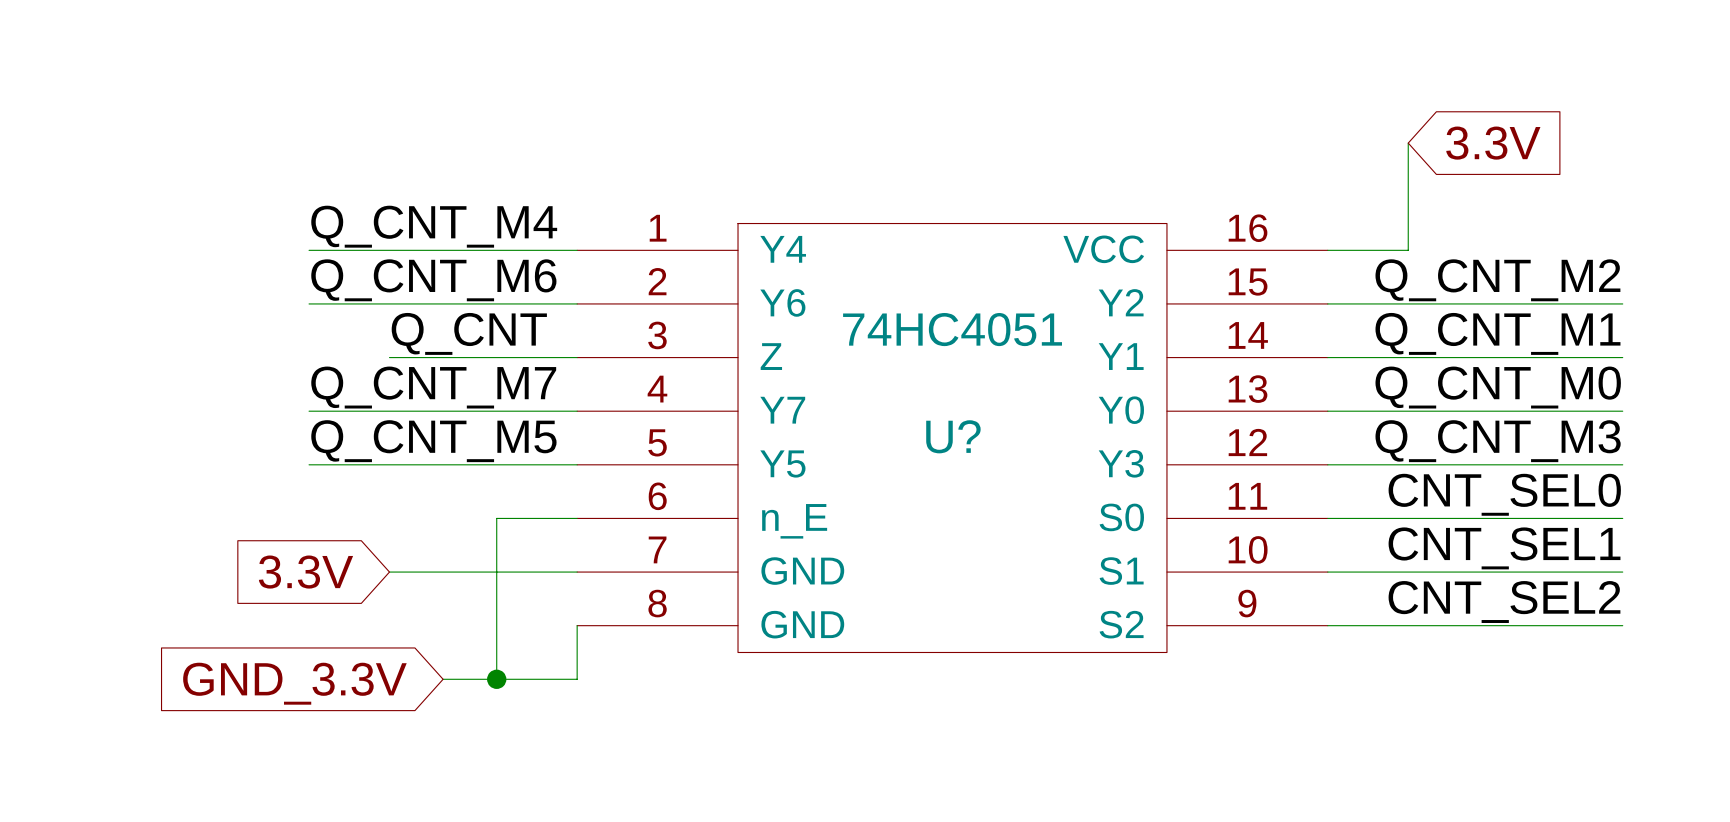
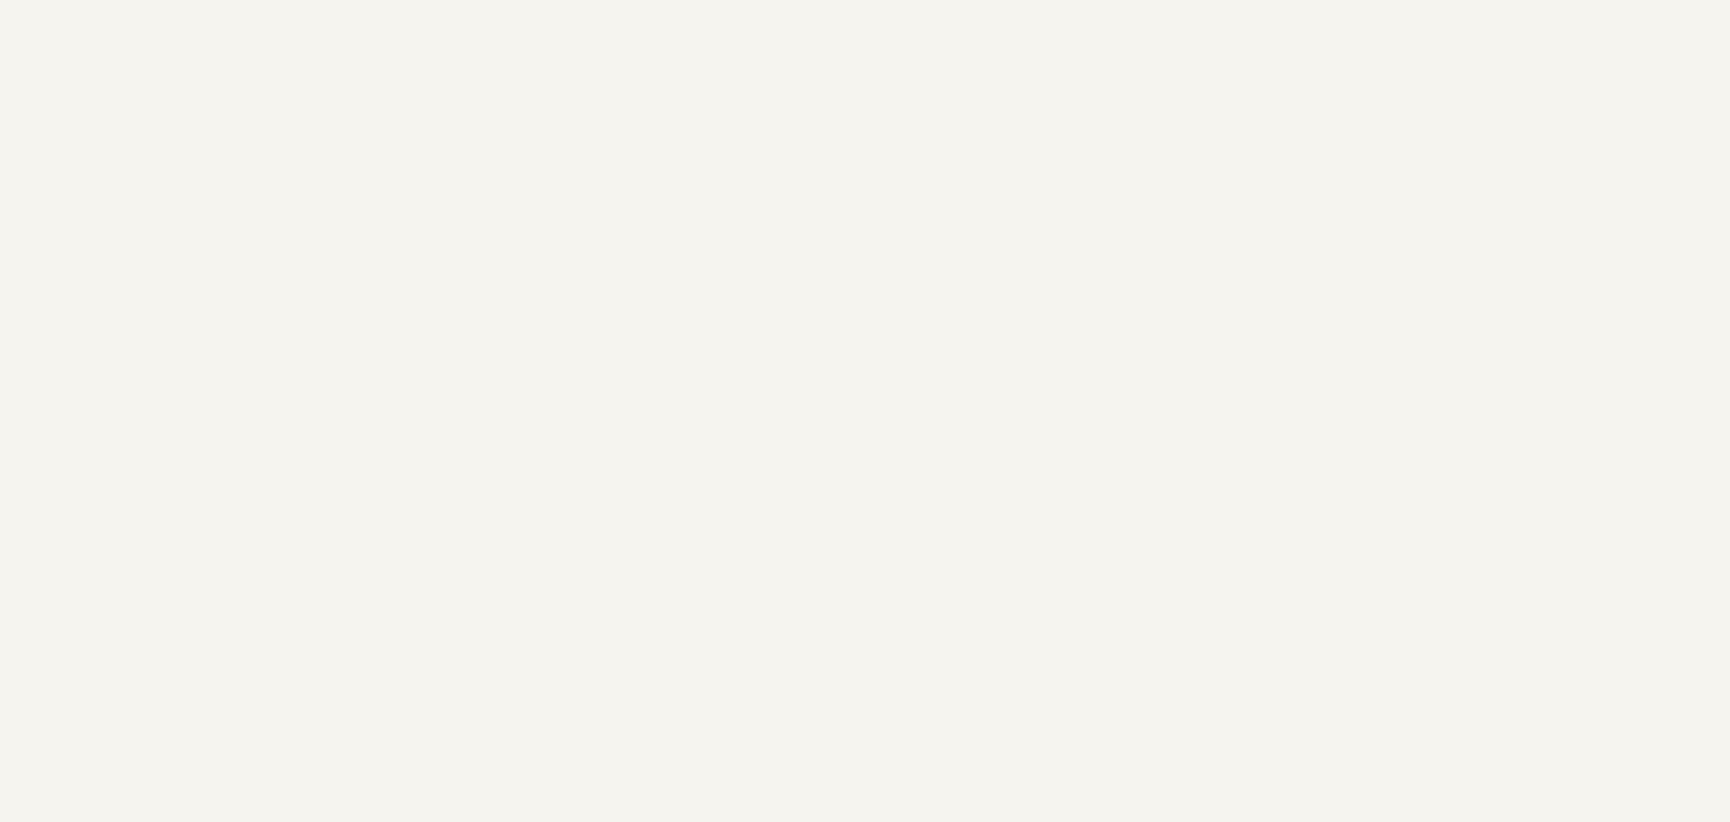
wire: (1408, 143) (1408, 250) (1327, 250) -> none
global label: 3.3V (1493, 143) -> none
label: Q_CNT_M4 (434, 226) -> none
wire: (309, 250) (577, 250) -> none
label: Q_CNT_M6 (433, 280) -> none
label: Q_CNT_M2 (1497, 280) -> none
wire: (309, 303) (577, 303) -> none
wire: (1327, 303) (1622, 303) -> none
label: Q_CNT (469, 333) -> none
label: Q_CNT_M1 (1497, 333) -> none
wire: (389, 357) (577, 357) -> none
wire: (1327, 357) (1622, 357) -> none
label: Q_CNT_M7 (433, 387) -> none
label: Q_CNT_M0 (1498, 387) -> none
wire: (309, 411) (577, 411) -> none
wire: (1327, 411) (1622, 411) -> none
U?: 74HC4051 (952, 438) -> none
label: Q_CNT_M5 (433, 441) -> none
label: Q_CNT_M3 (1498, 441) -> none
wire: (309, 464) (577, 464) -> none
wire: (1327, 464) (1622, 464) -> none
label: CNT_SEL0 (1504, 494) -> none
wire: (577, 518) (496, 518) (496, 679) -> none
wire: (1327, 518) (1622, 518) -> none
label: CNT_SEL1 (1504, 548) -> none
global label: 3.3V (305, 572) -> none
wire: (389, 572) (577, 572) -> none
wire: (1327, 572) (1622, 572) -> none
label: CNT_SEL2 (1504, 602) -> none
wire: (577, 625) (577, 679) (443, 679) -> none
wire: (1327, 625) (1622, 625) -> none
junction: (496, 679) -> none
global label: GND_3.3V (294, 683) -> none

